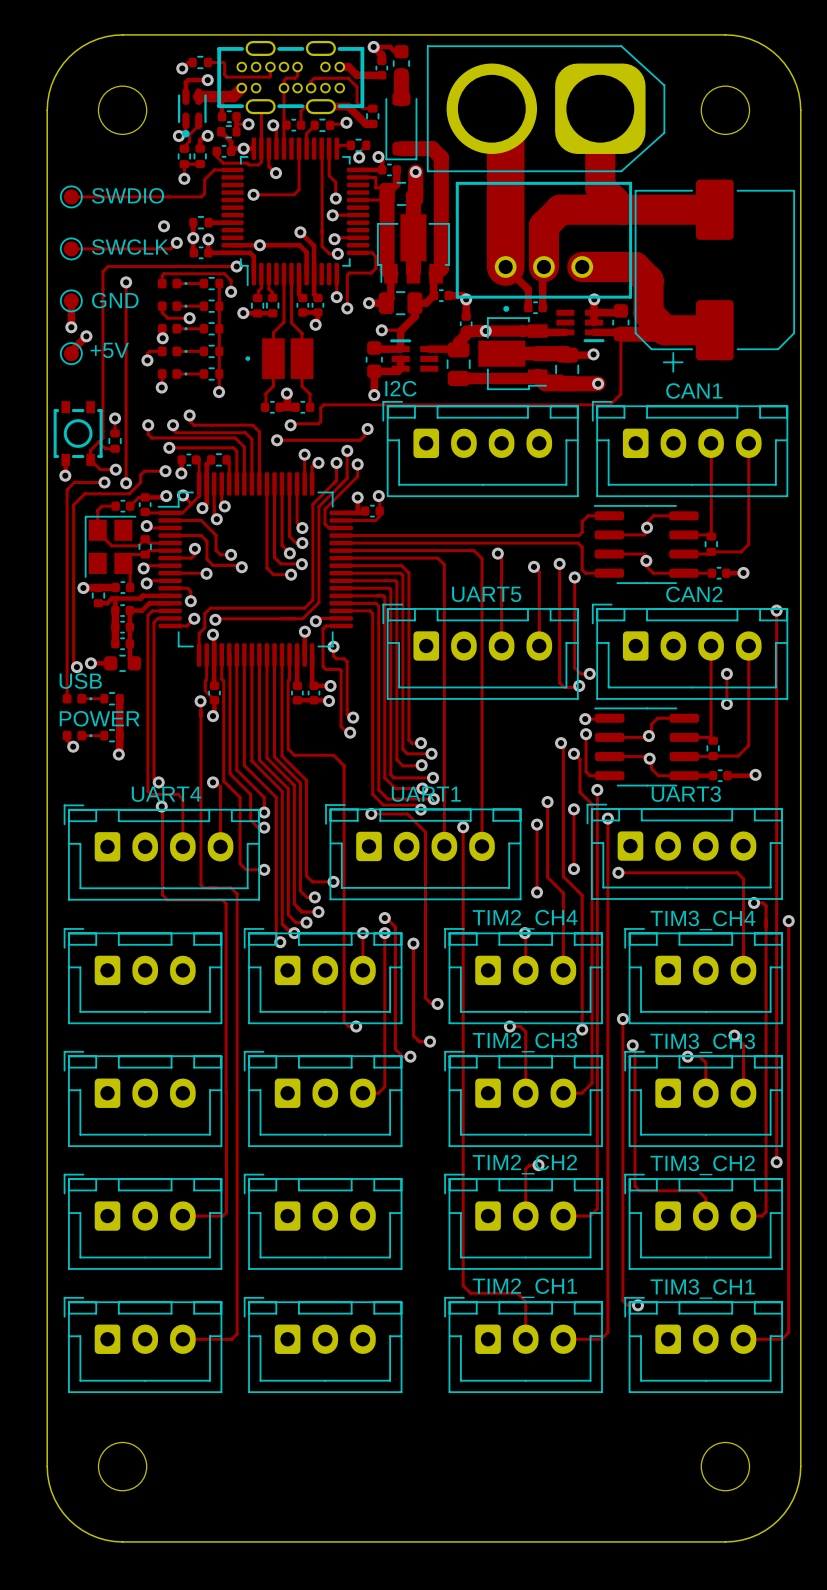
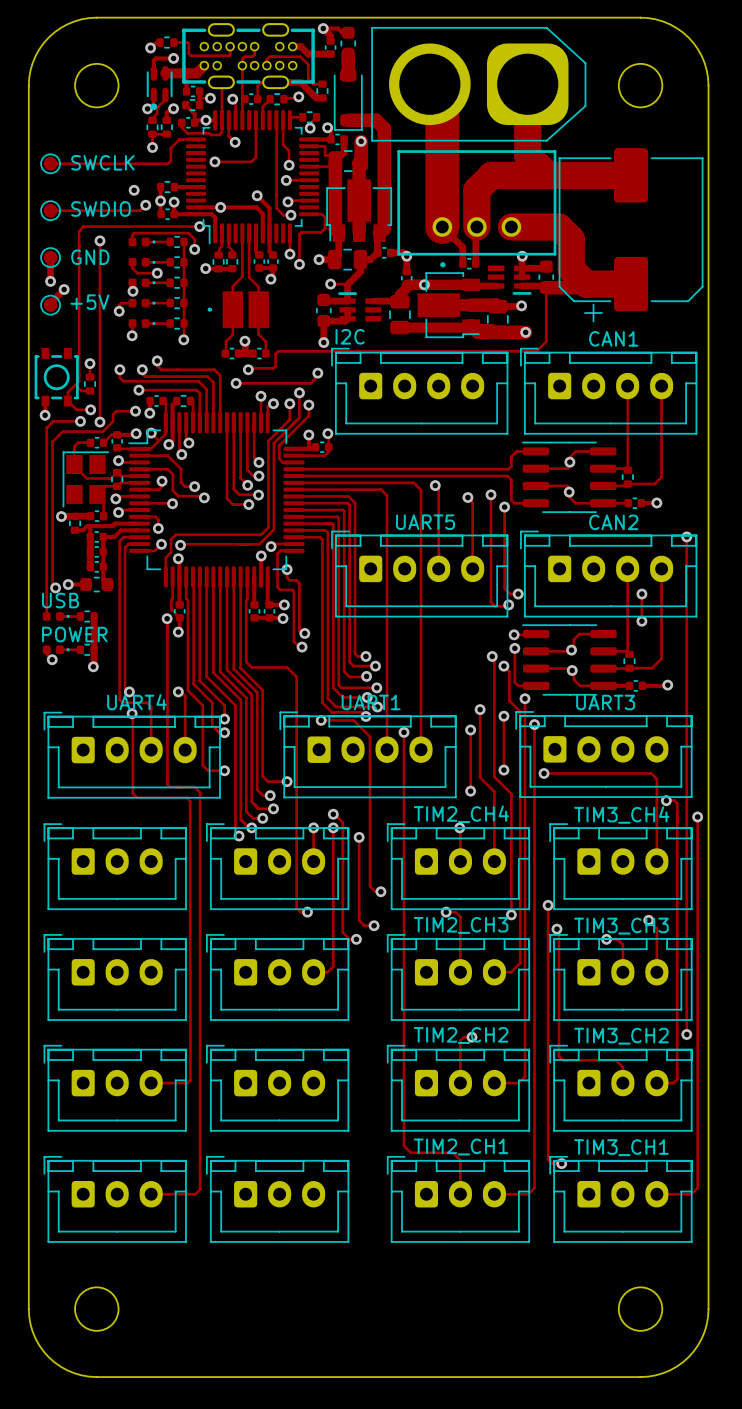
text: SWDIO (128, 195) -> SWCLK (102, 162)
text: SWCLK (130, 247) -> SWDIO (100, 209)

